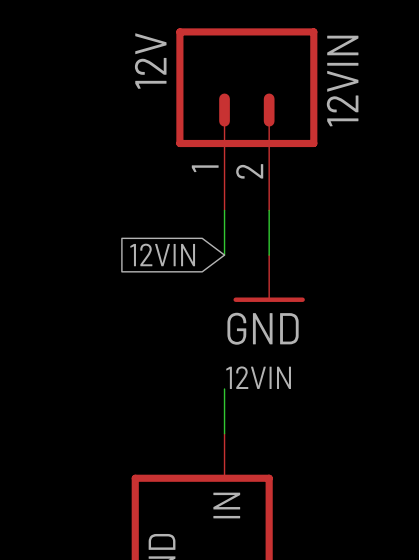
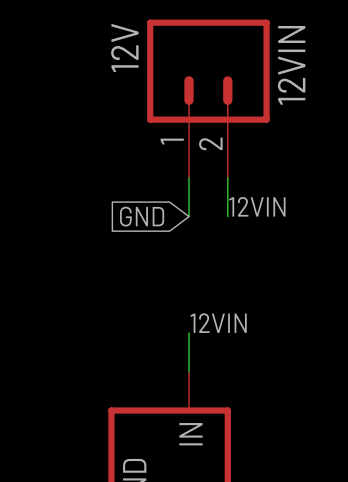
label: none -> 12VIN (257, 206)
global label: 12VIN (162, 254) -> GND (142, 216)
power symbol: GND (269, 278) -> none

